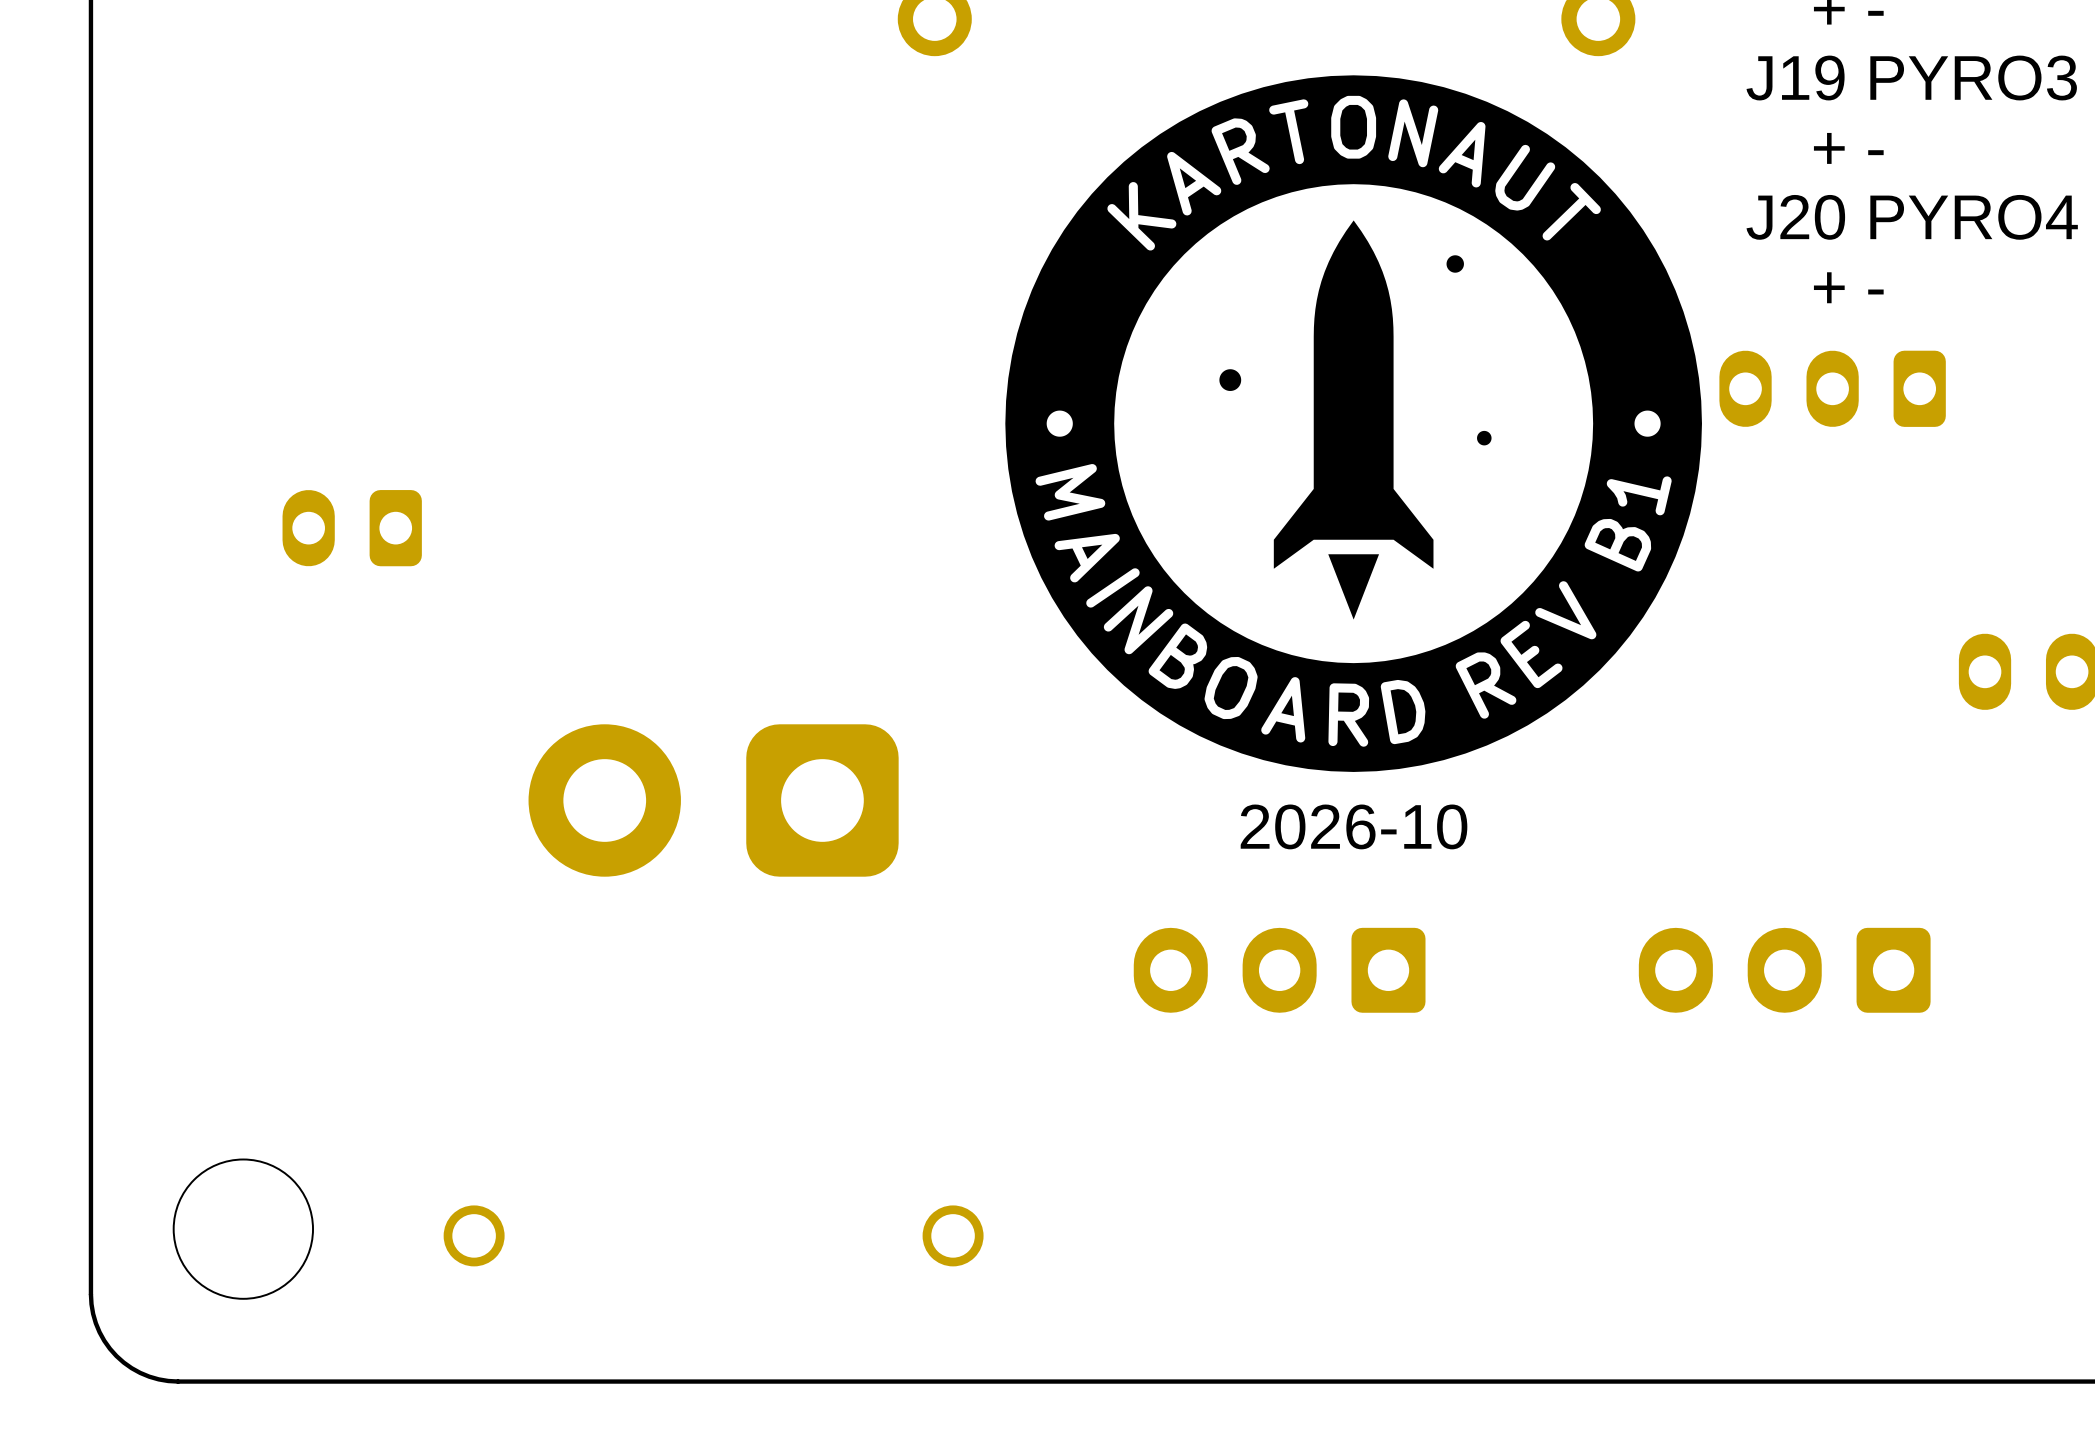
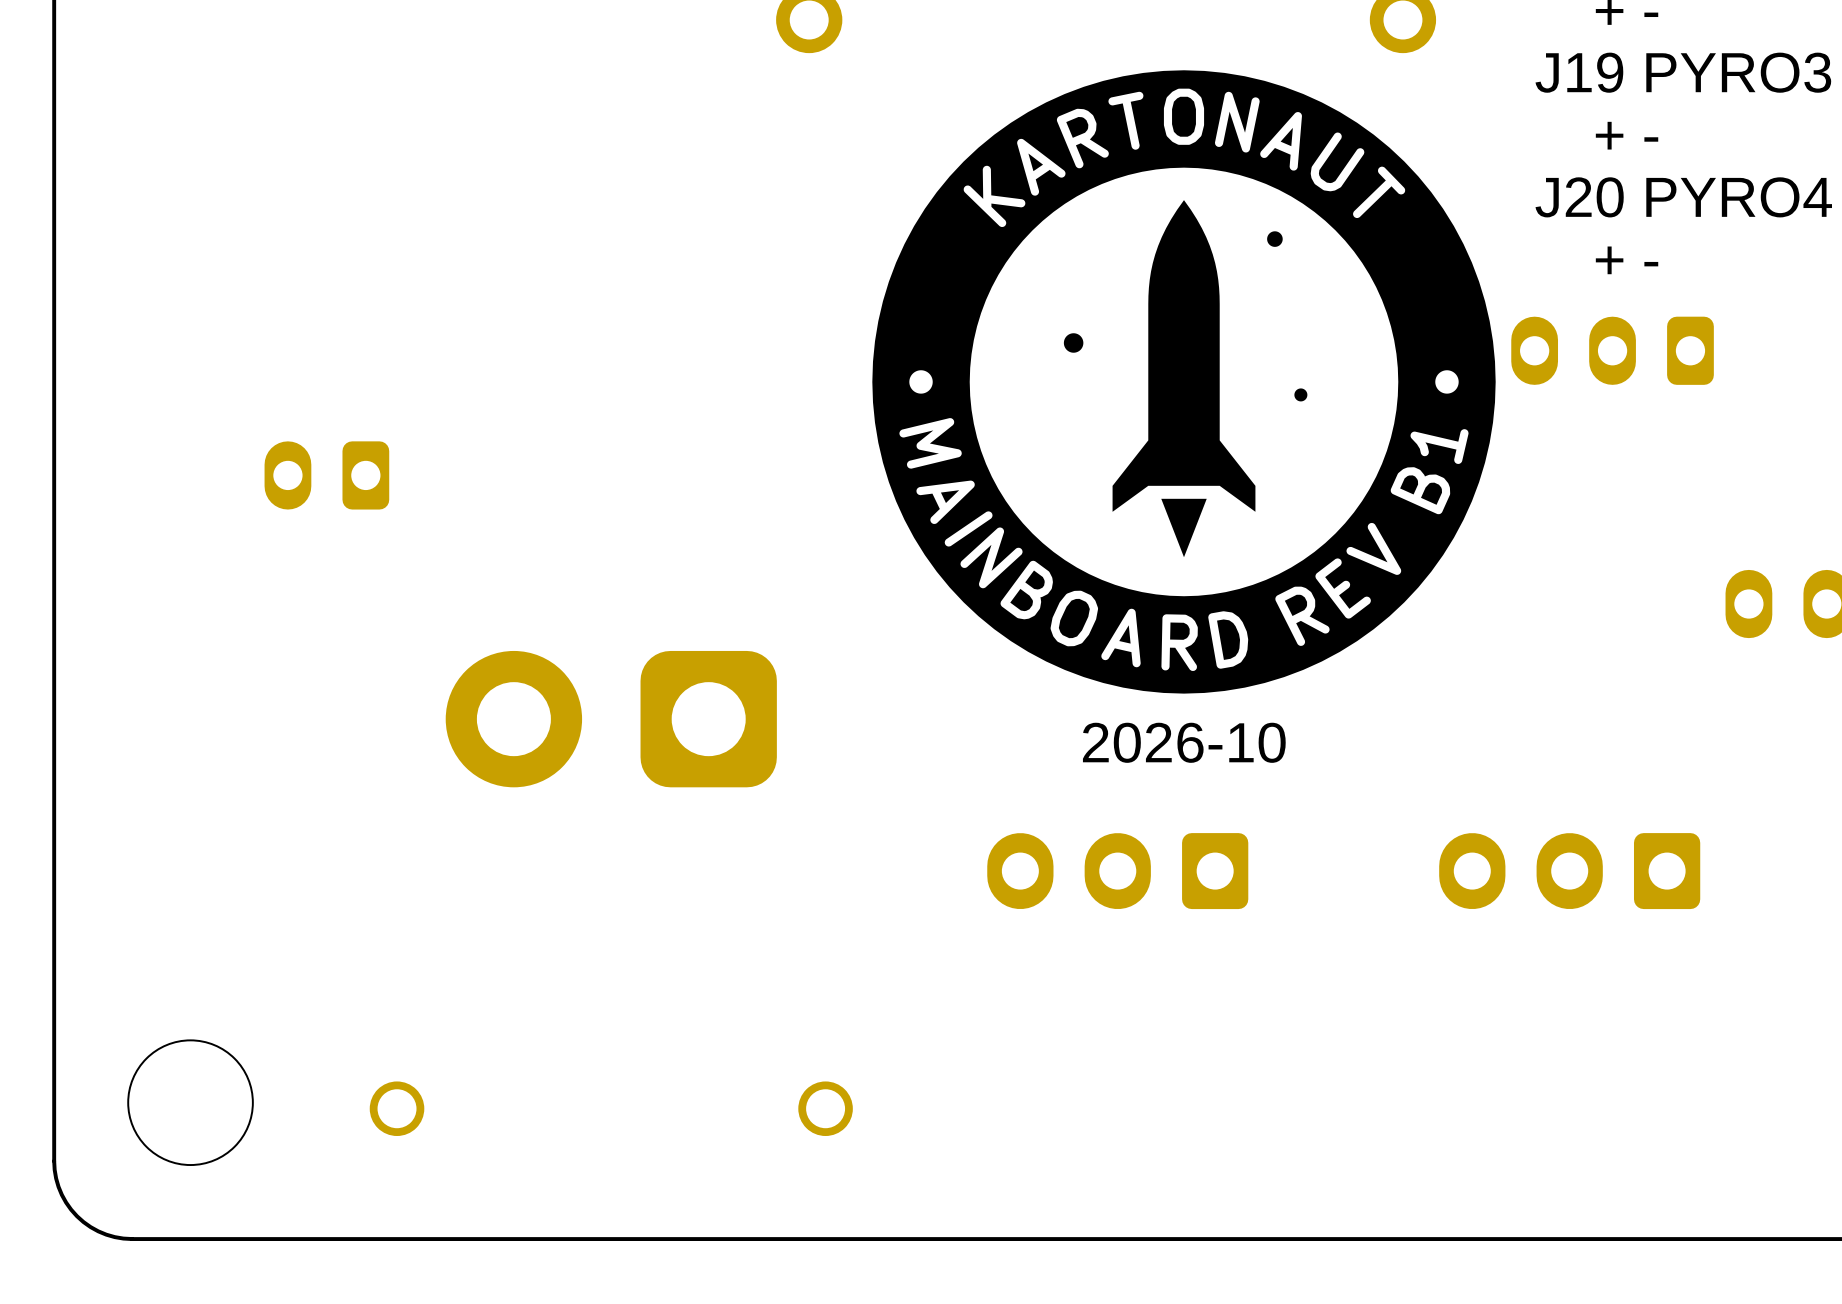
part position: (352, 528) -> (326, 475)

